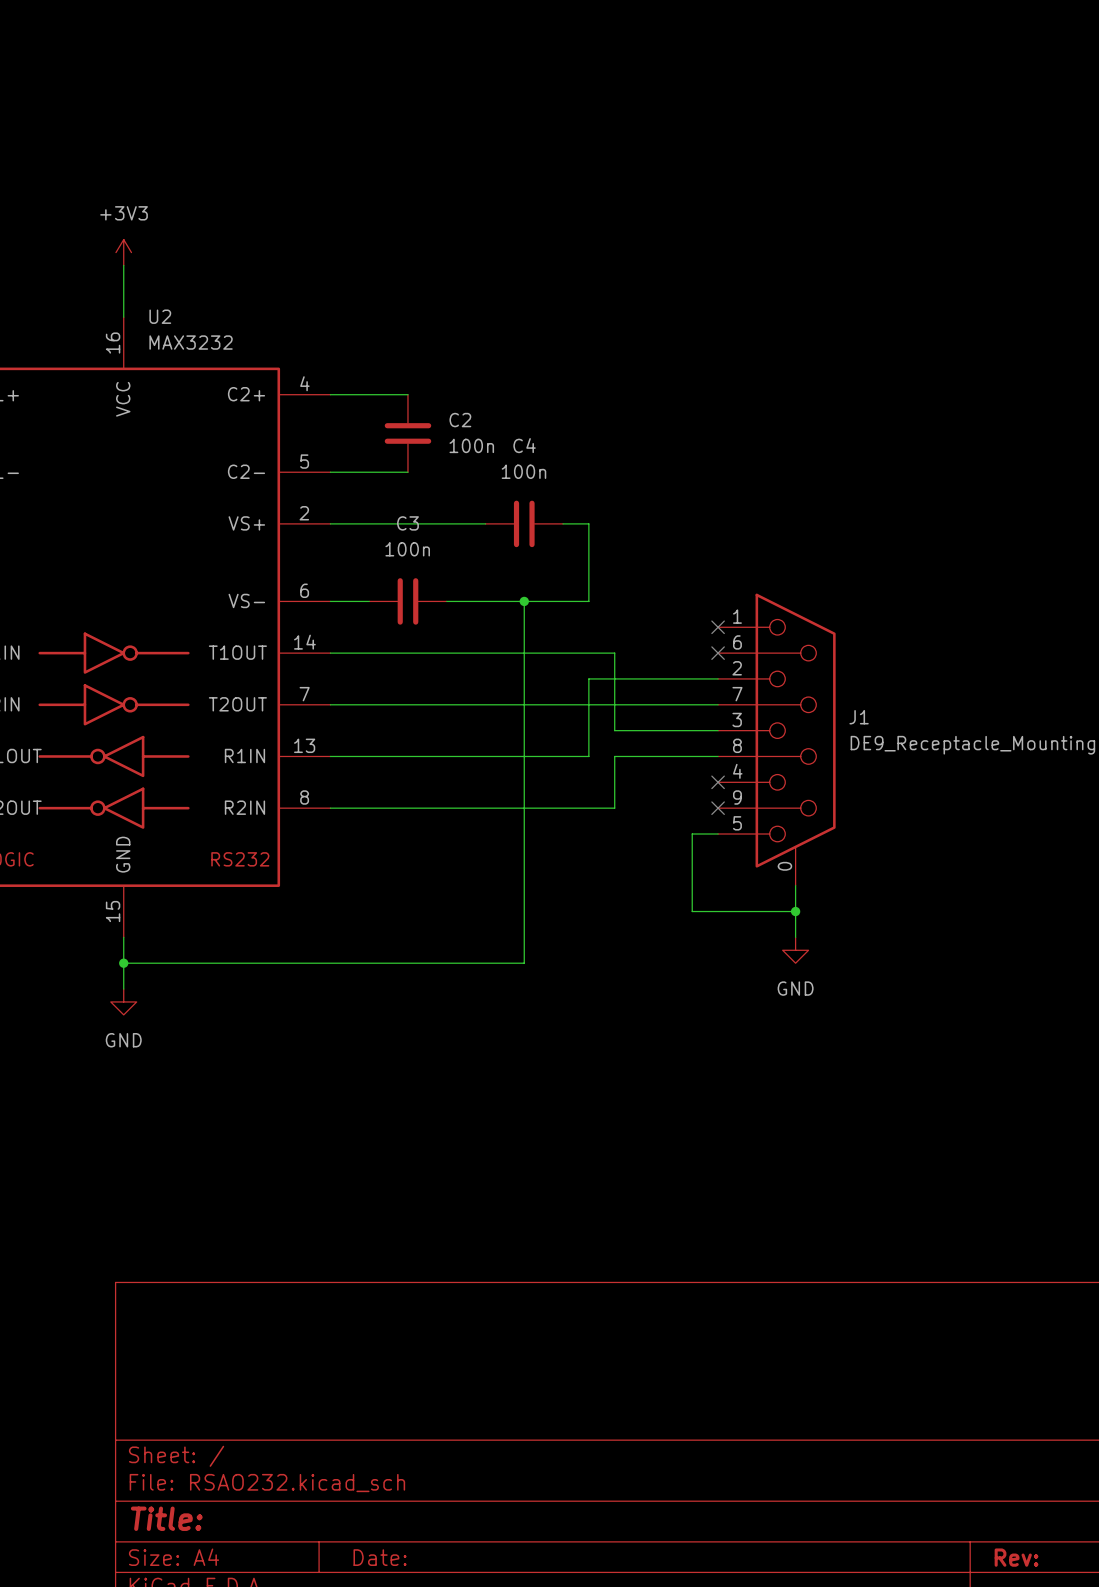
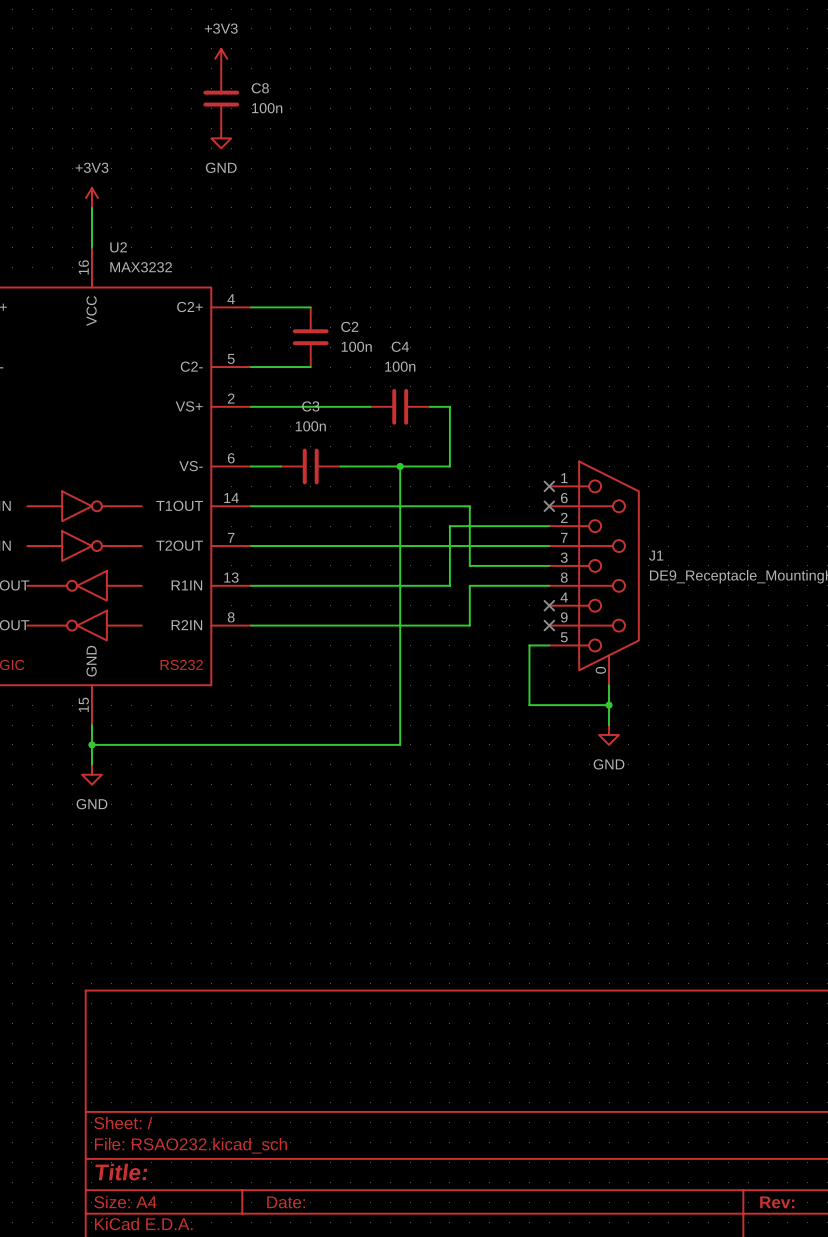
power symbol: none -> +3V3 (221, 58)
C8: none -> 100n (221, 98)
power symbol: none -> GND (221, 138)

